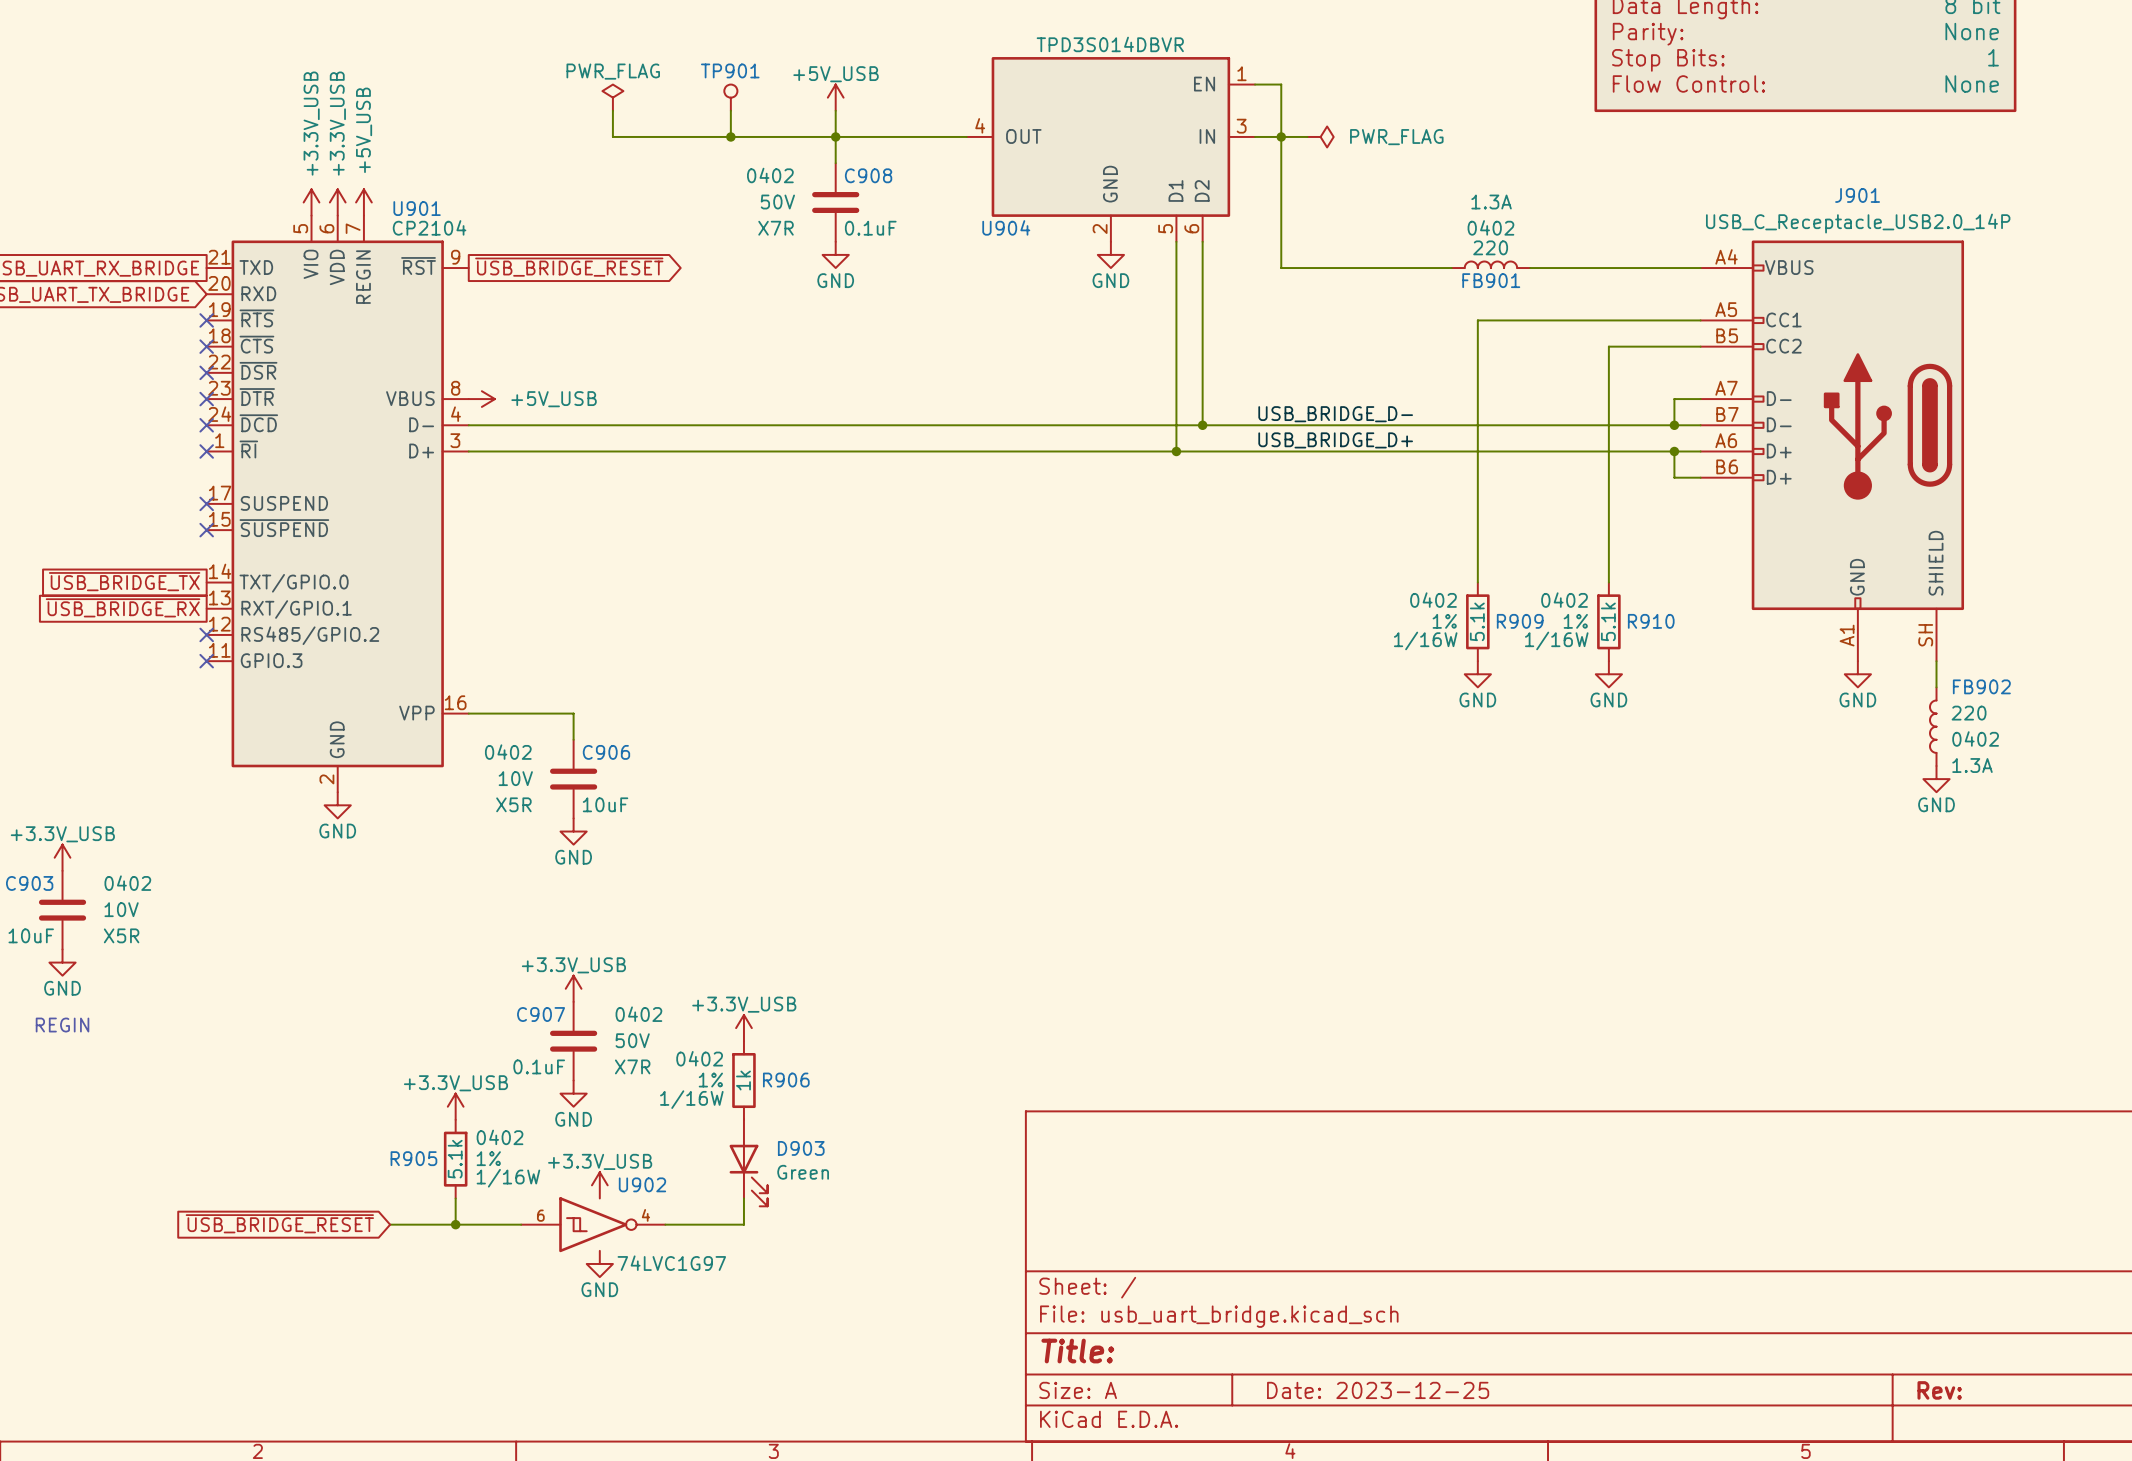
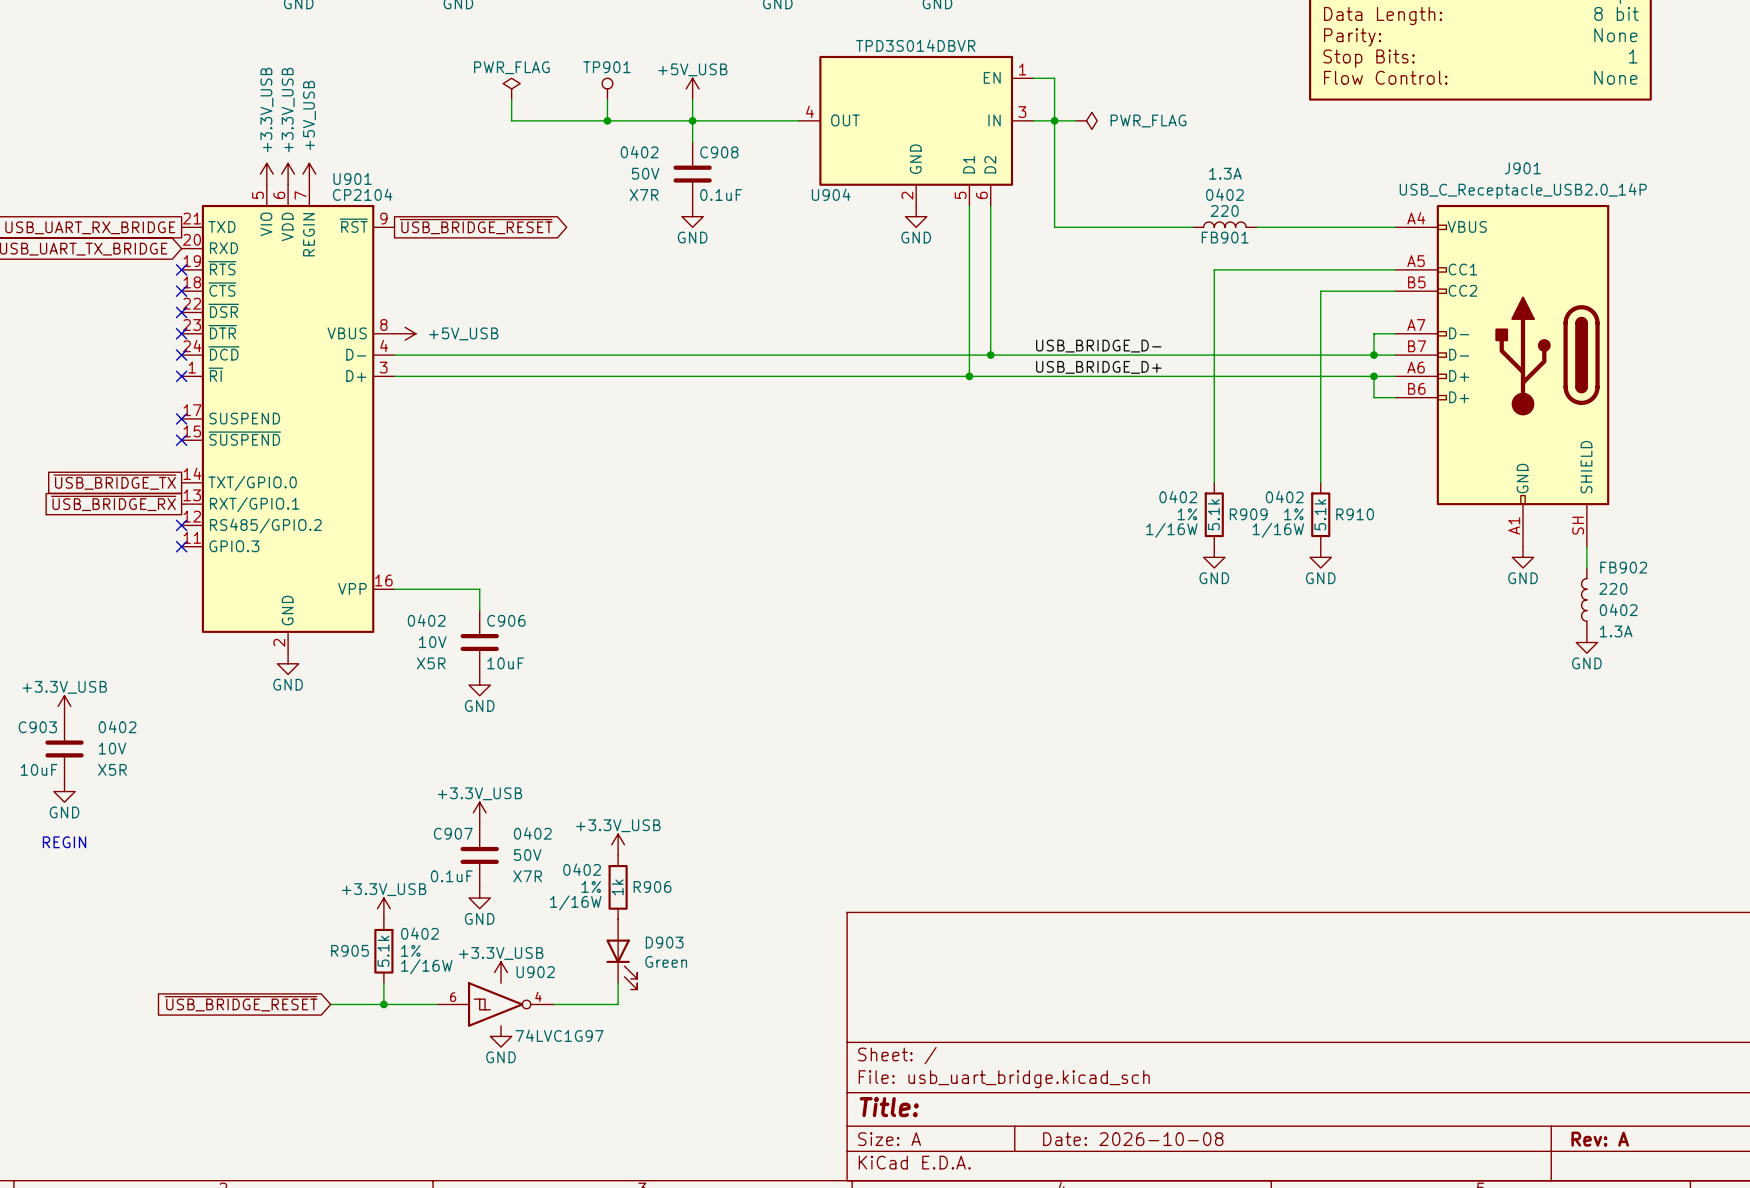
title block: Date: 2023-12-25 (1378, 1390) -> Date: 2026-10-08 (1133, 1139)
title block: Rev: (1939, 1390) -> Rev: A (1600, 1139)

